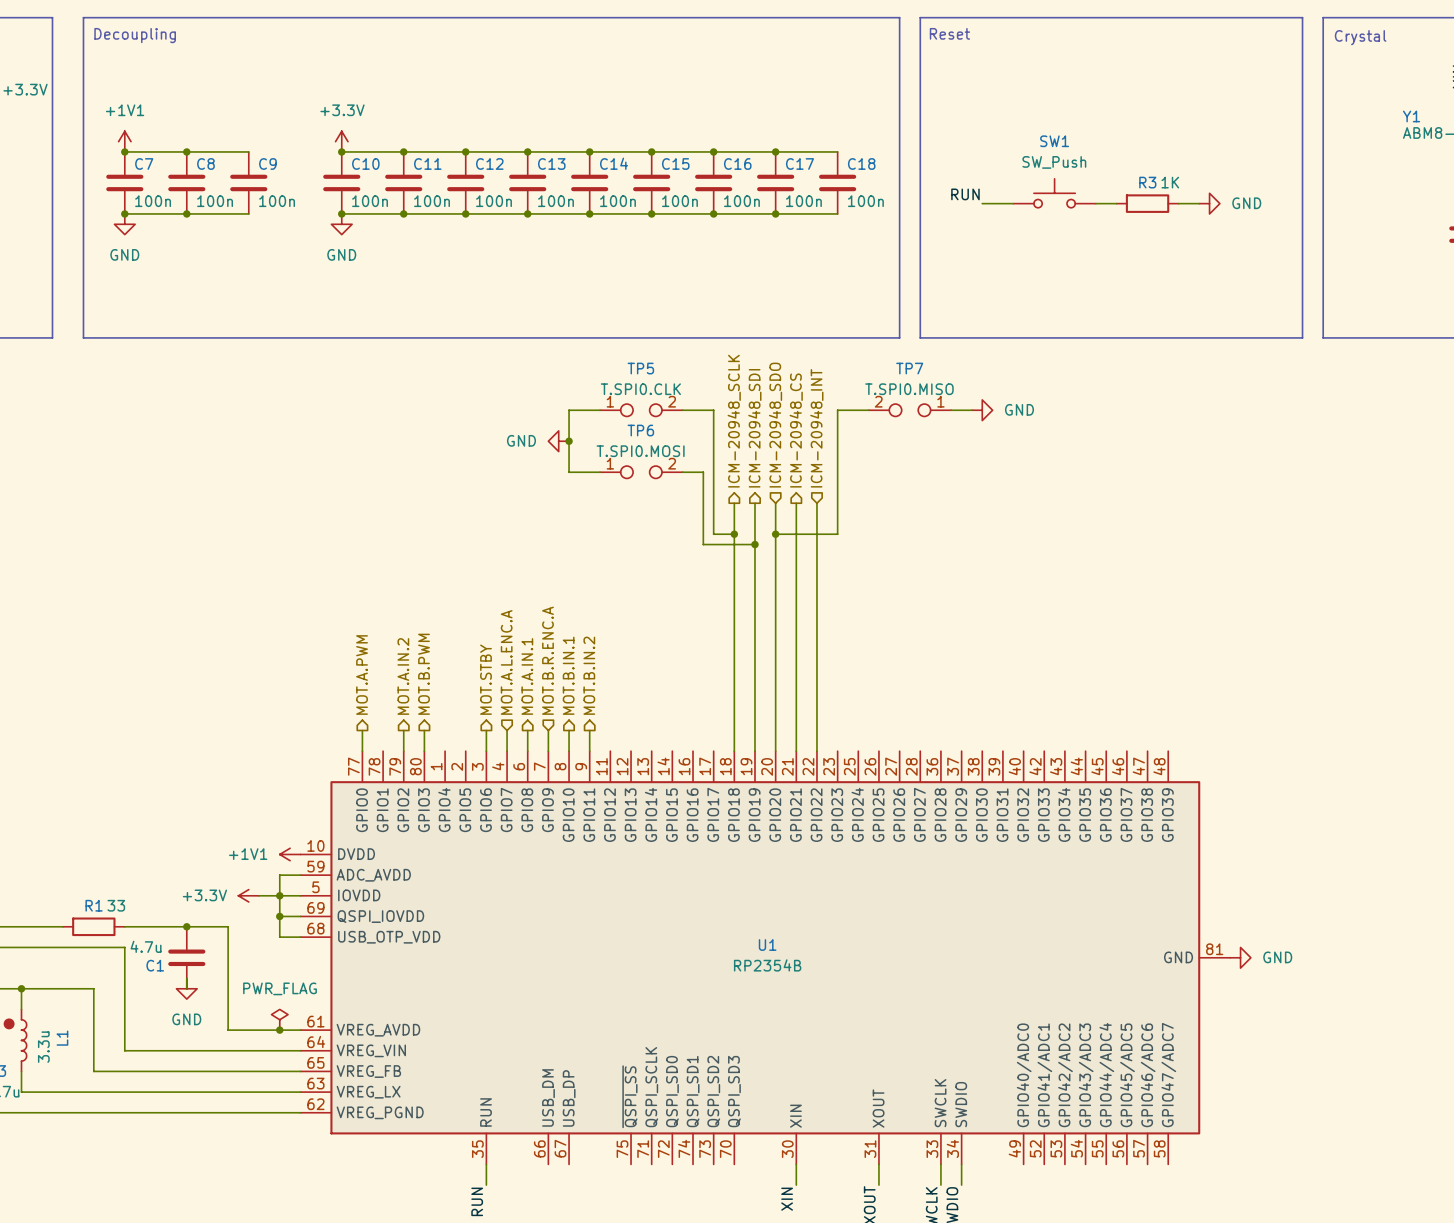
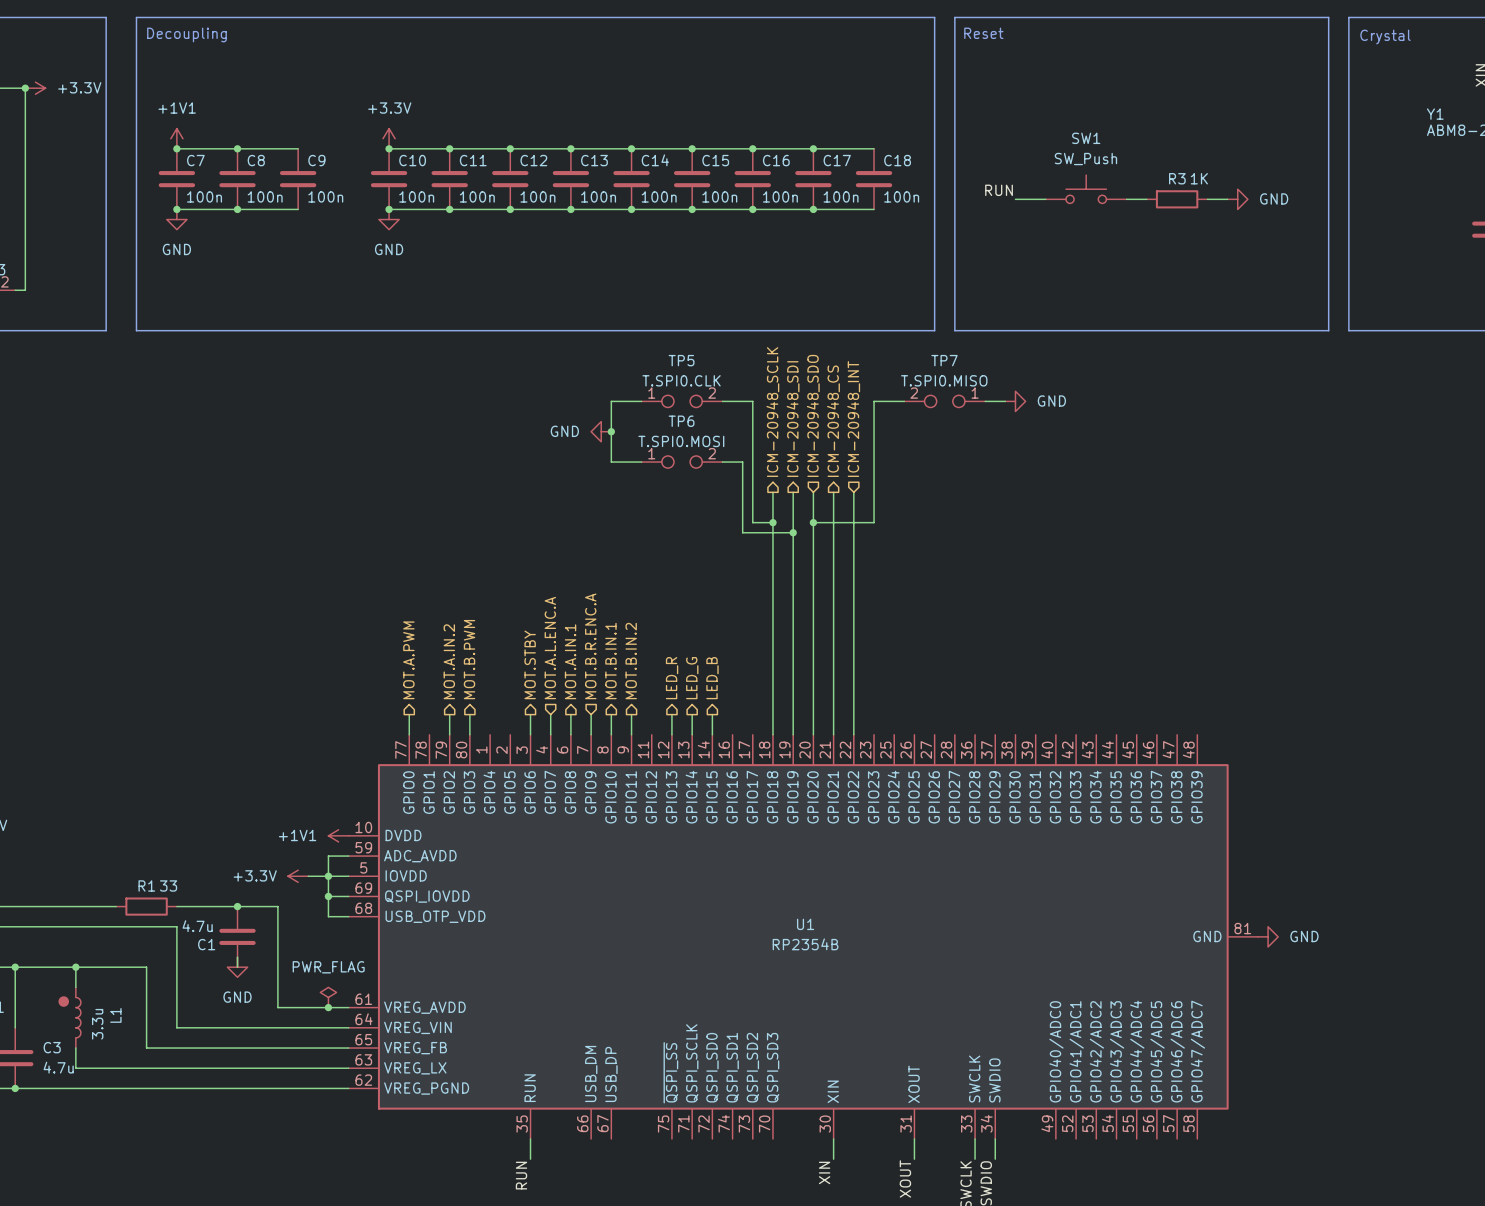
hierarchical label: none -> LED_R (672, 678)
hierarchical label: none -> LED_G (692, 678)
hierarchical label: none -> LED_B (712, 678)
wire: none -> (671, 714) (671, 734)
wire: none -> (692, 714) (692, 734)
wire: none -> (712, 714) (712, 734)

